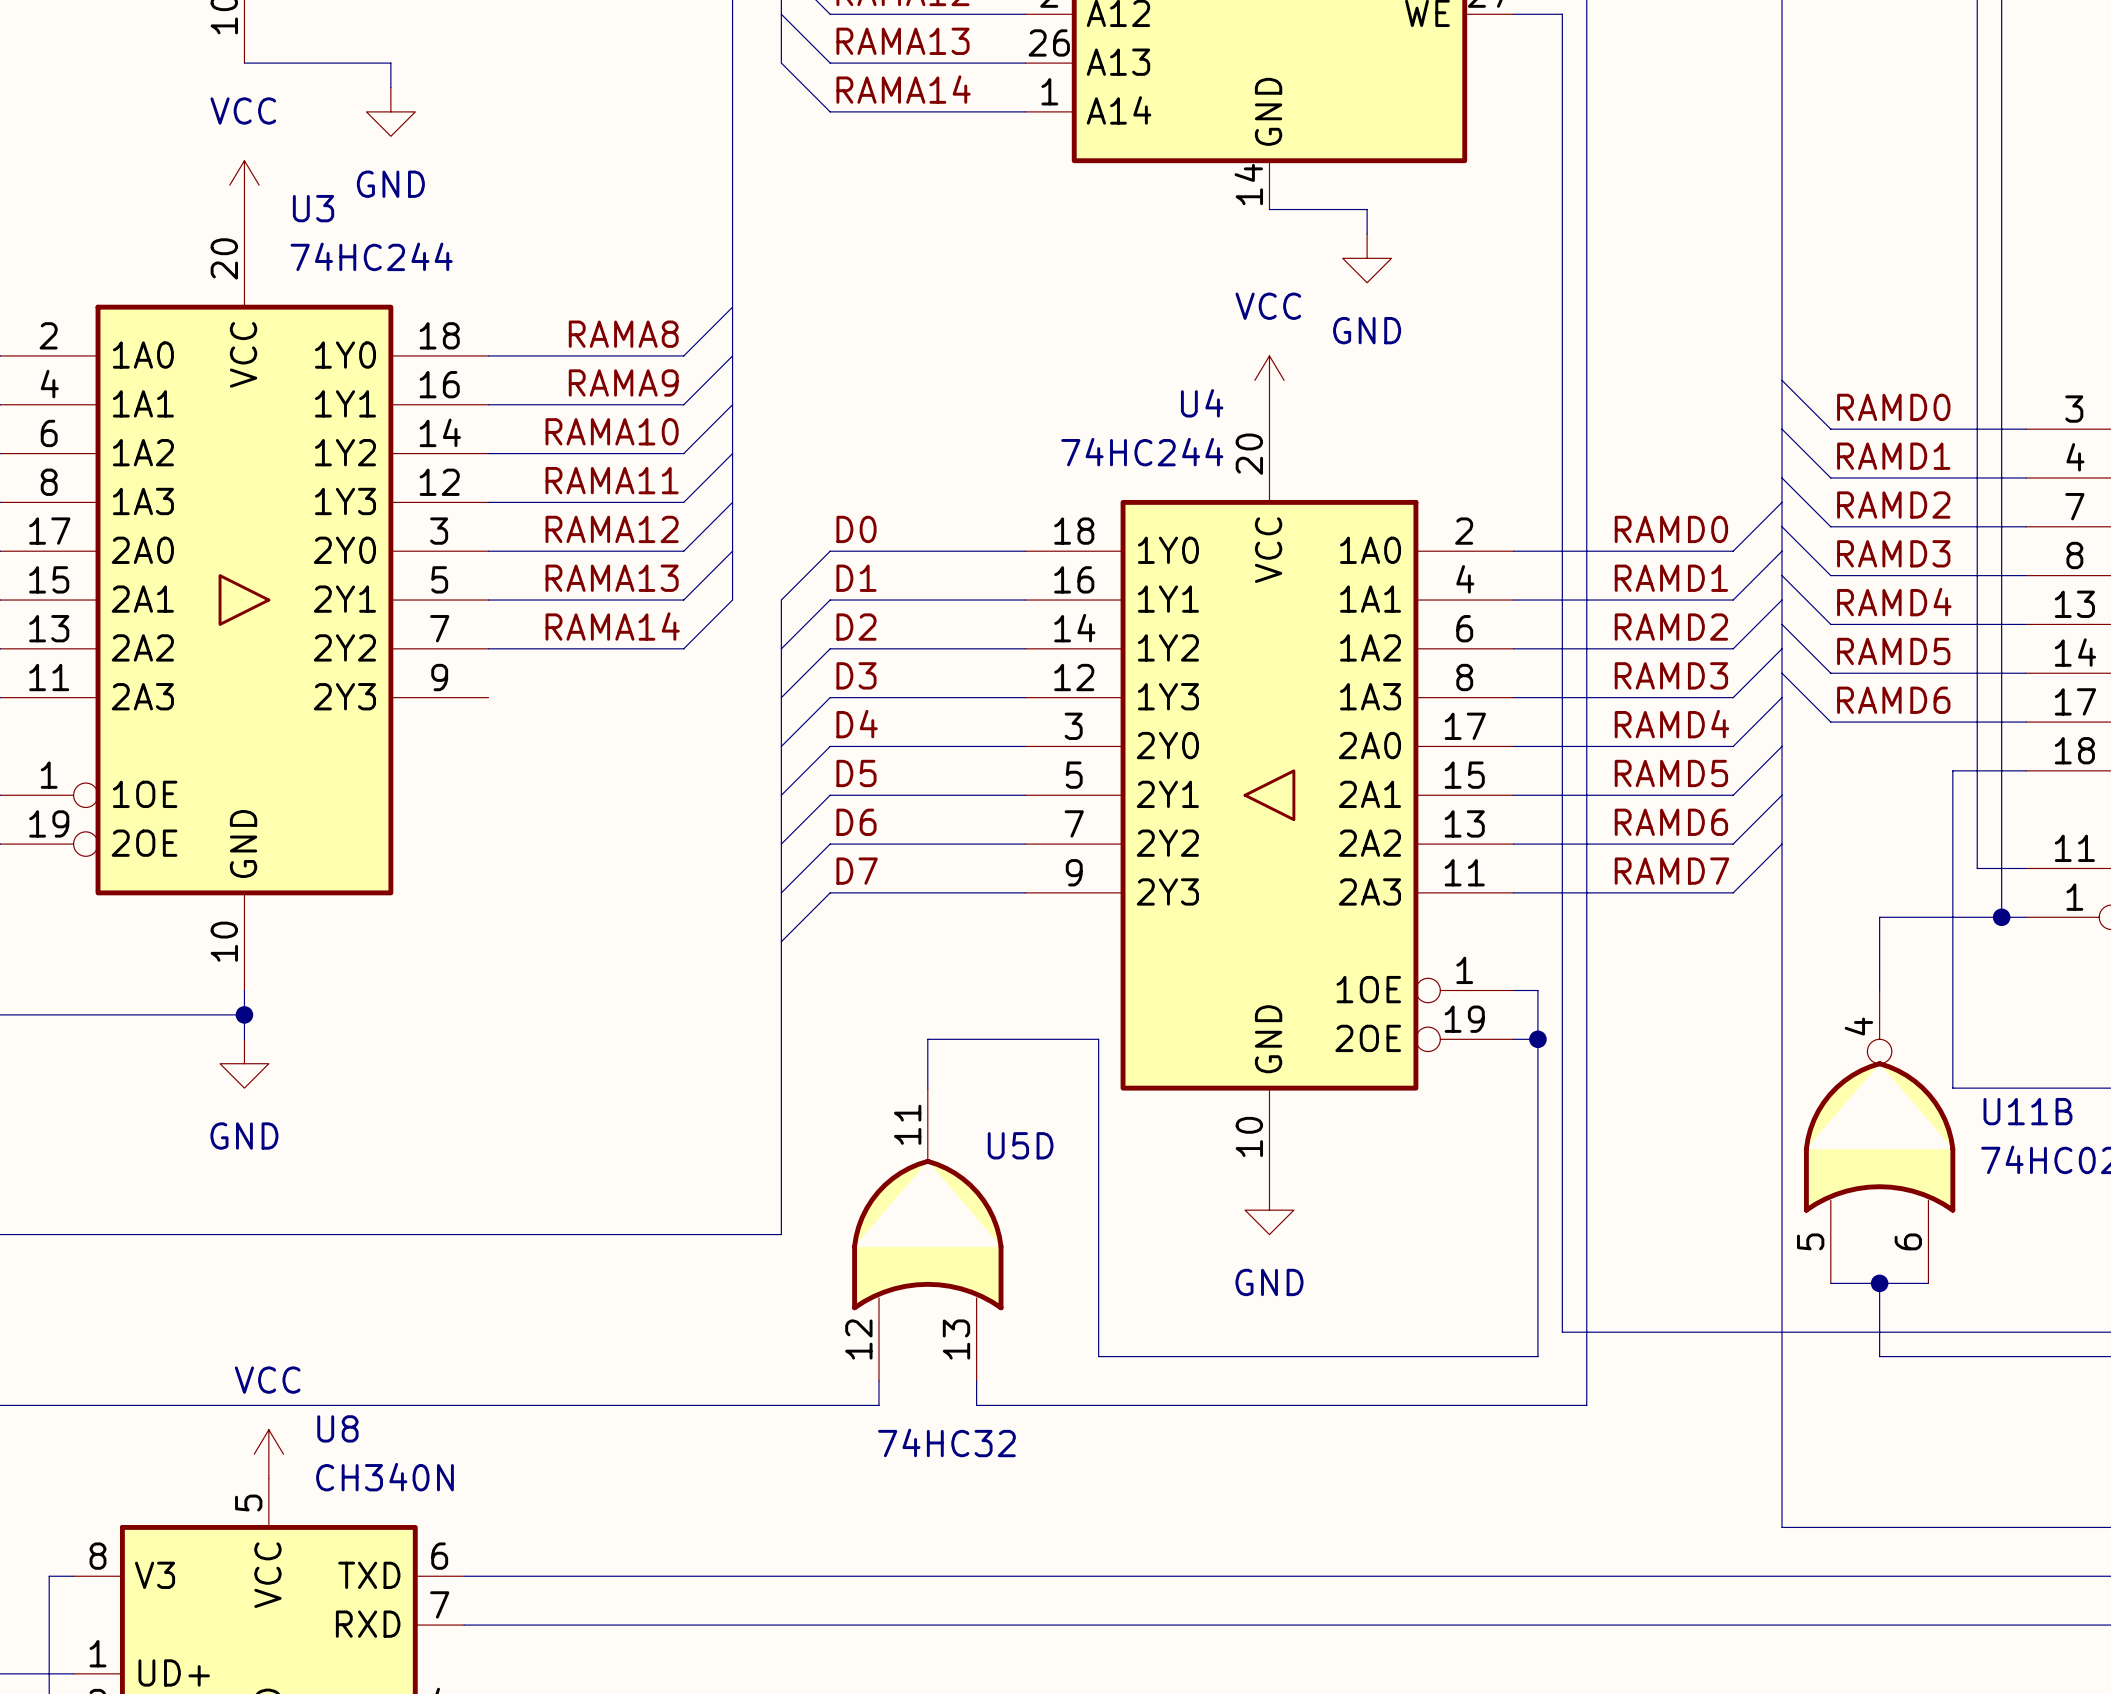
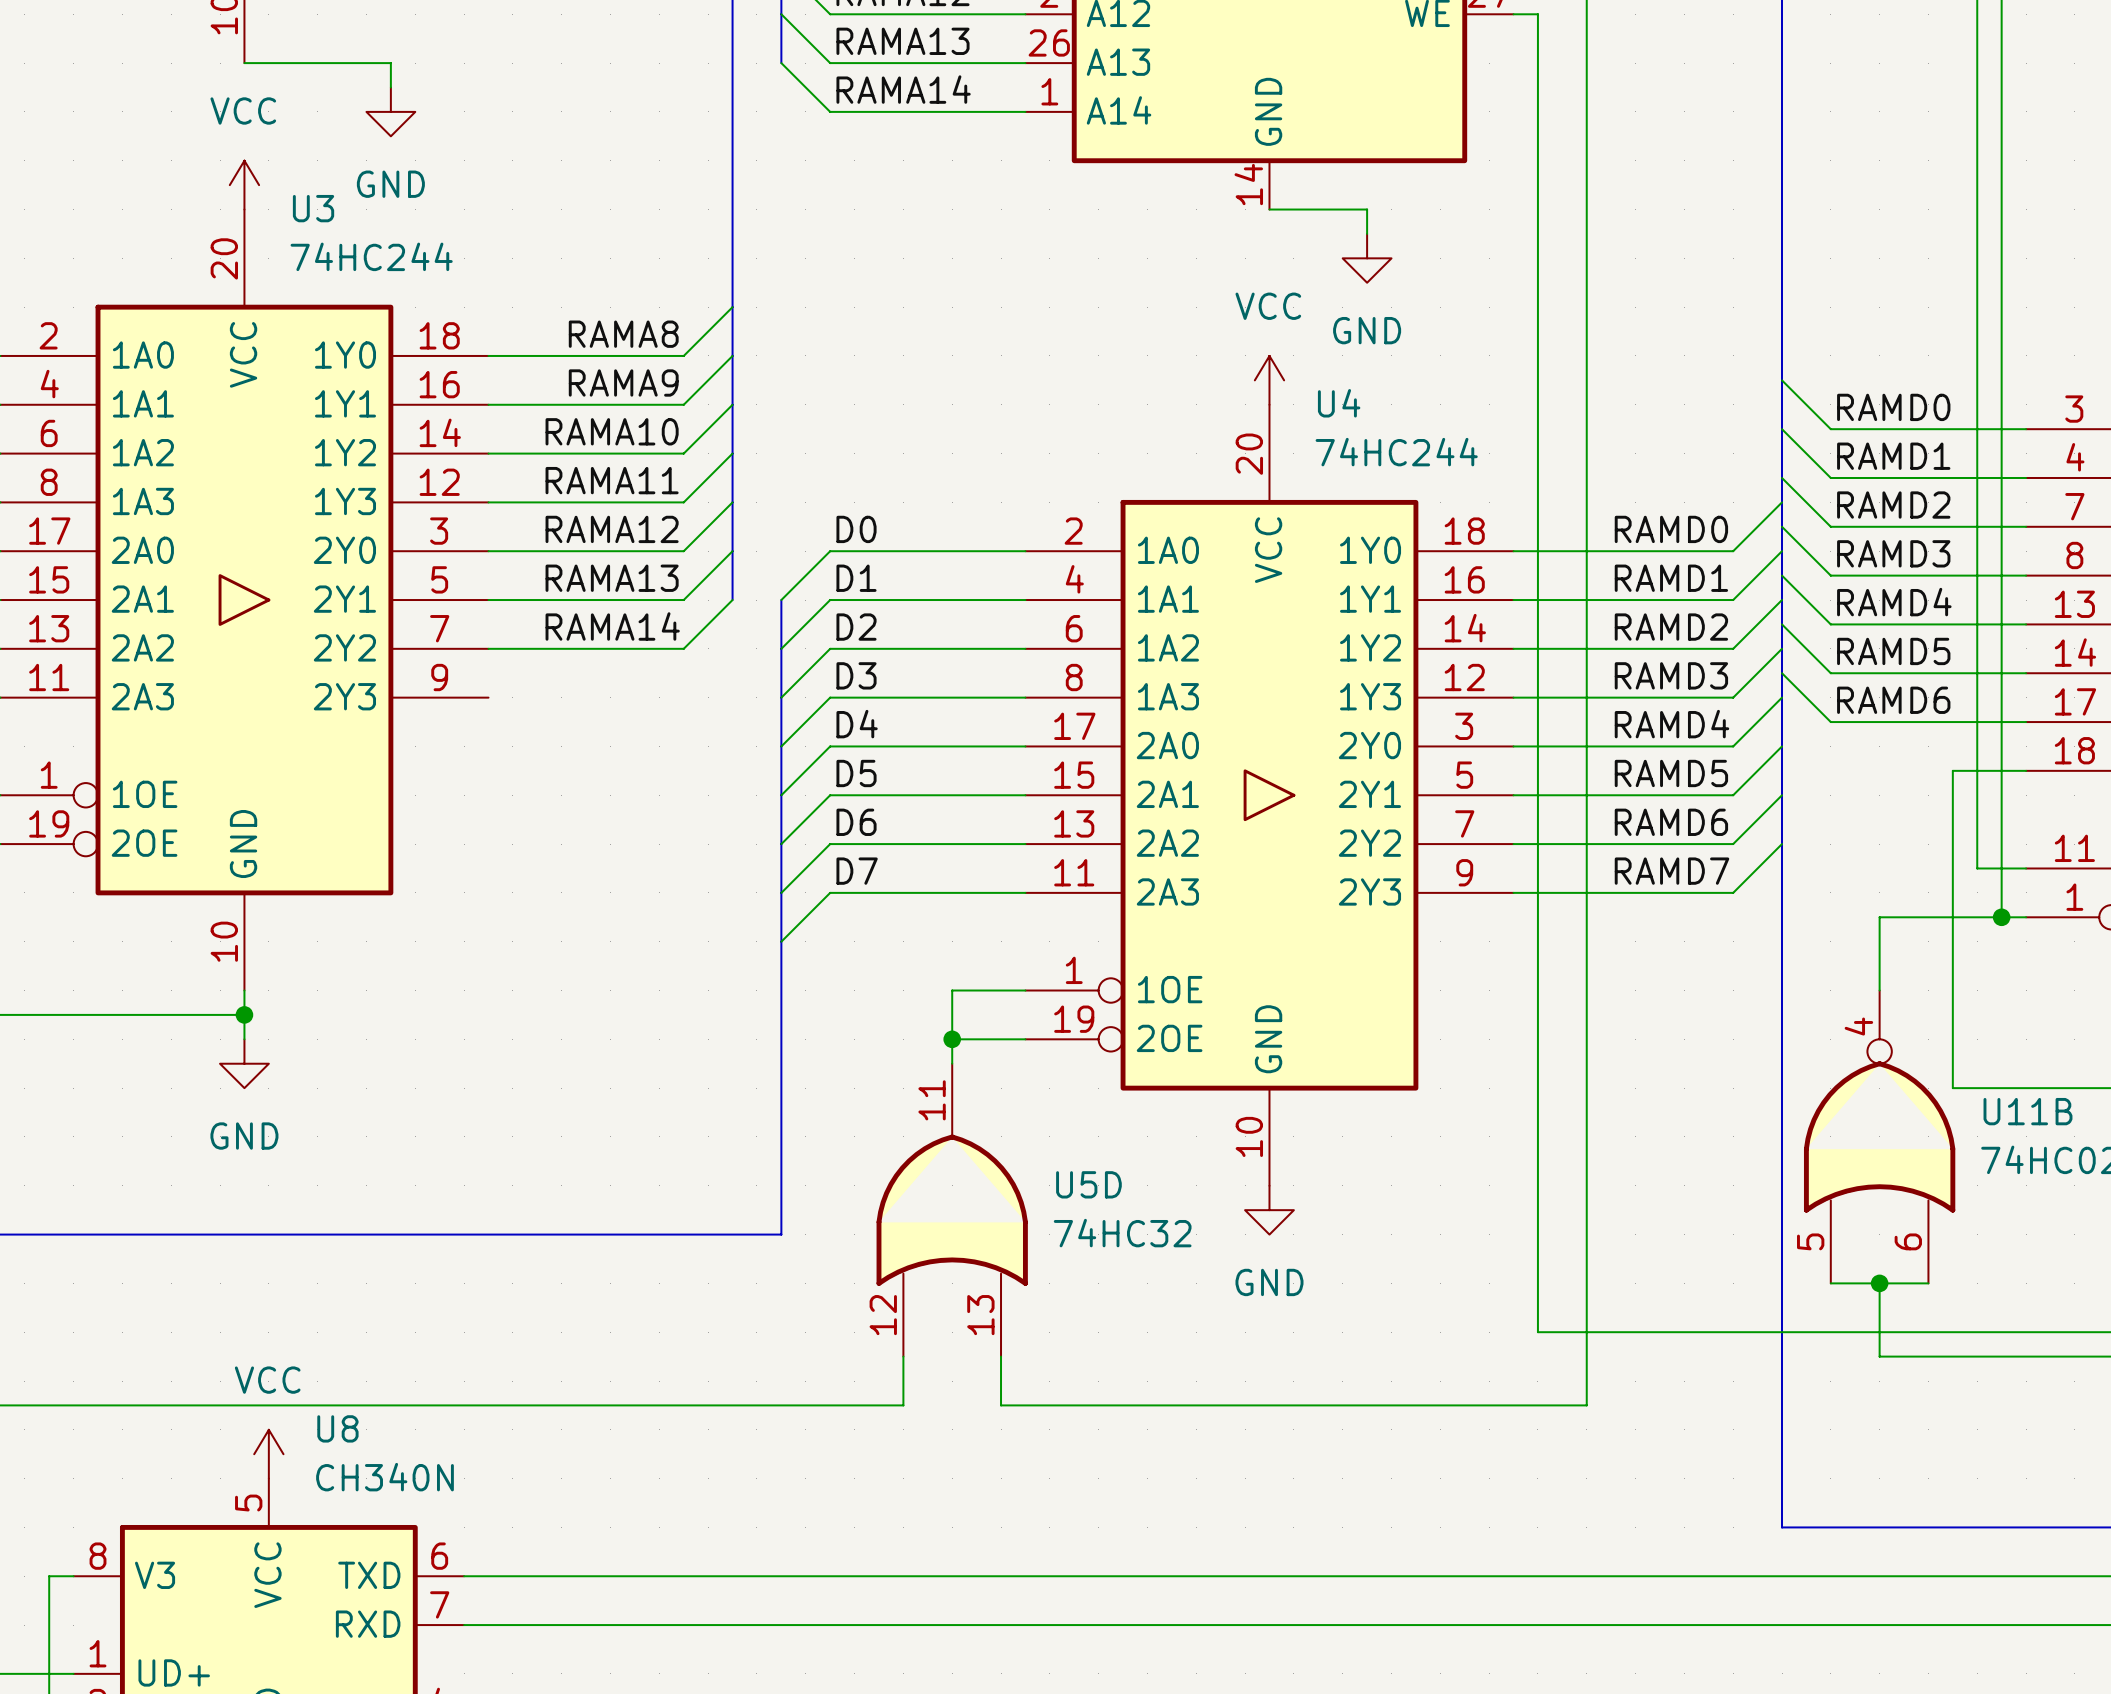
wire: (1537, 14) (1562, 14) (1562, 1332) -> (1537, 14) (1537, 990)
U4 flip: as is (1269, 795) -> left-right (1269, 795)
wire: none -> (1025, 990) (952, 990) (952, 1063)
wire: (1513, 990) (1537, 990) -> none
wire: (952, 1039) (927, 1039) (927, 1088) -> none
junction: none -> (952, 1039)
wire: (1025, 1039) (1098, 1039) (1098, 1356) (1537, 1356) (1537, 1332) -> (1562, 1332) (1537, 1332)
wire: (1513, 1039) (1537, 1039) -> none
junction: (1537, 1039) -> none
U5D name position: U5D (1020, 1145) -> U5D (1088, 1184)
U5D position: (927, 1234) -> (952, 1210)
wire: (878, 1381) (878, 1405) -> (903, 1356) (903, 1405) (878, 1405)
wire: (976, 1381) (976, 1405) (1001, 1405) -> (1001, 1356) (1001, 1405)
U5D value position: 74HC32 (946, 1442) -> 74HC32 (1122, 1233)

